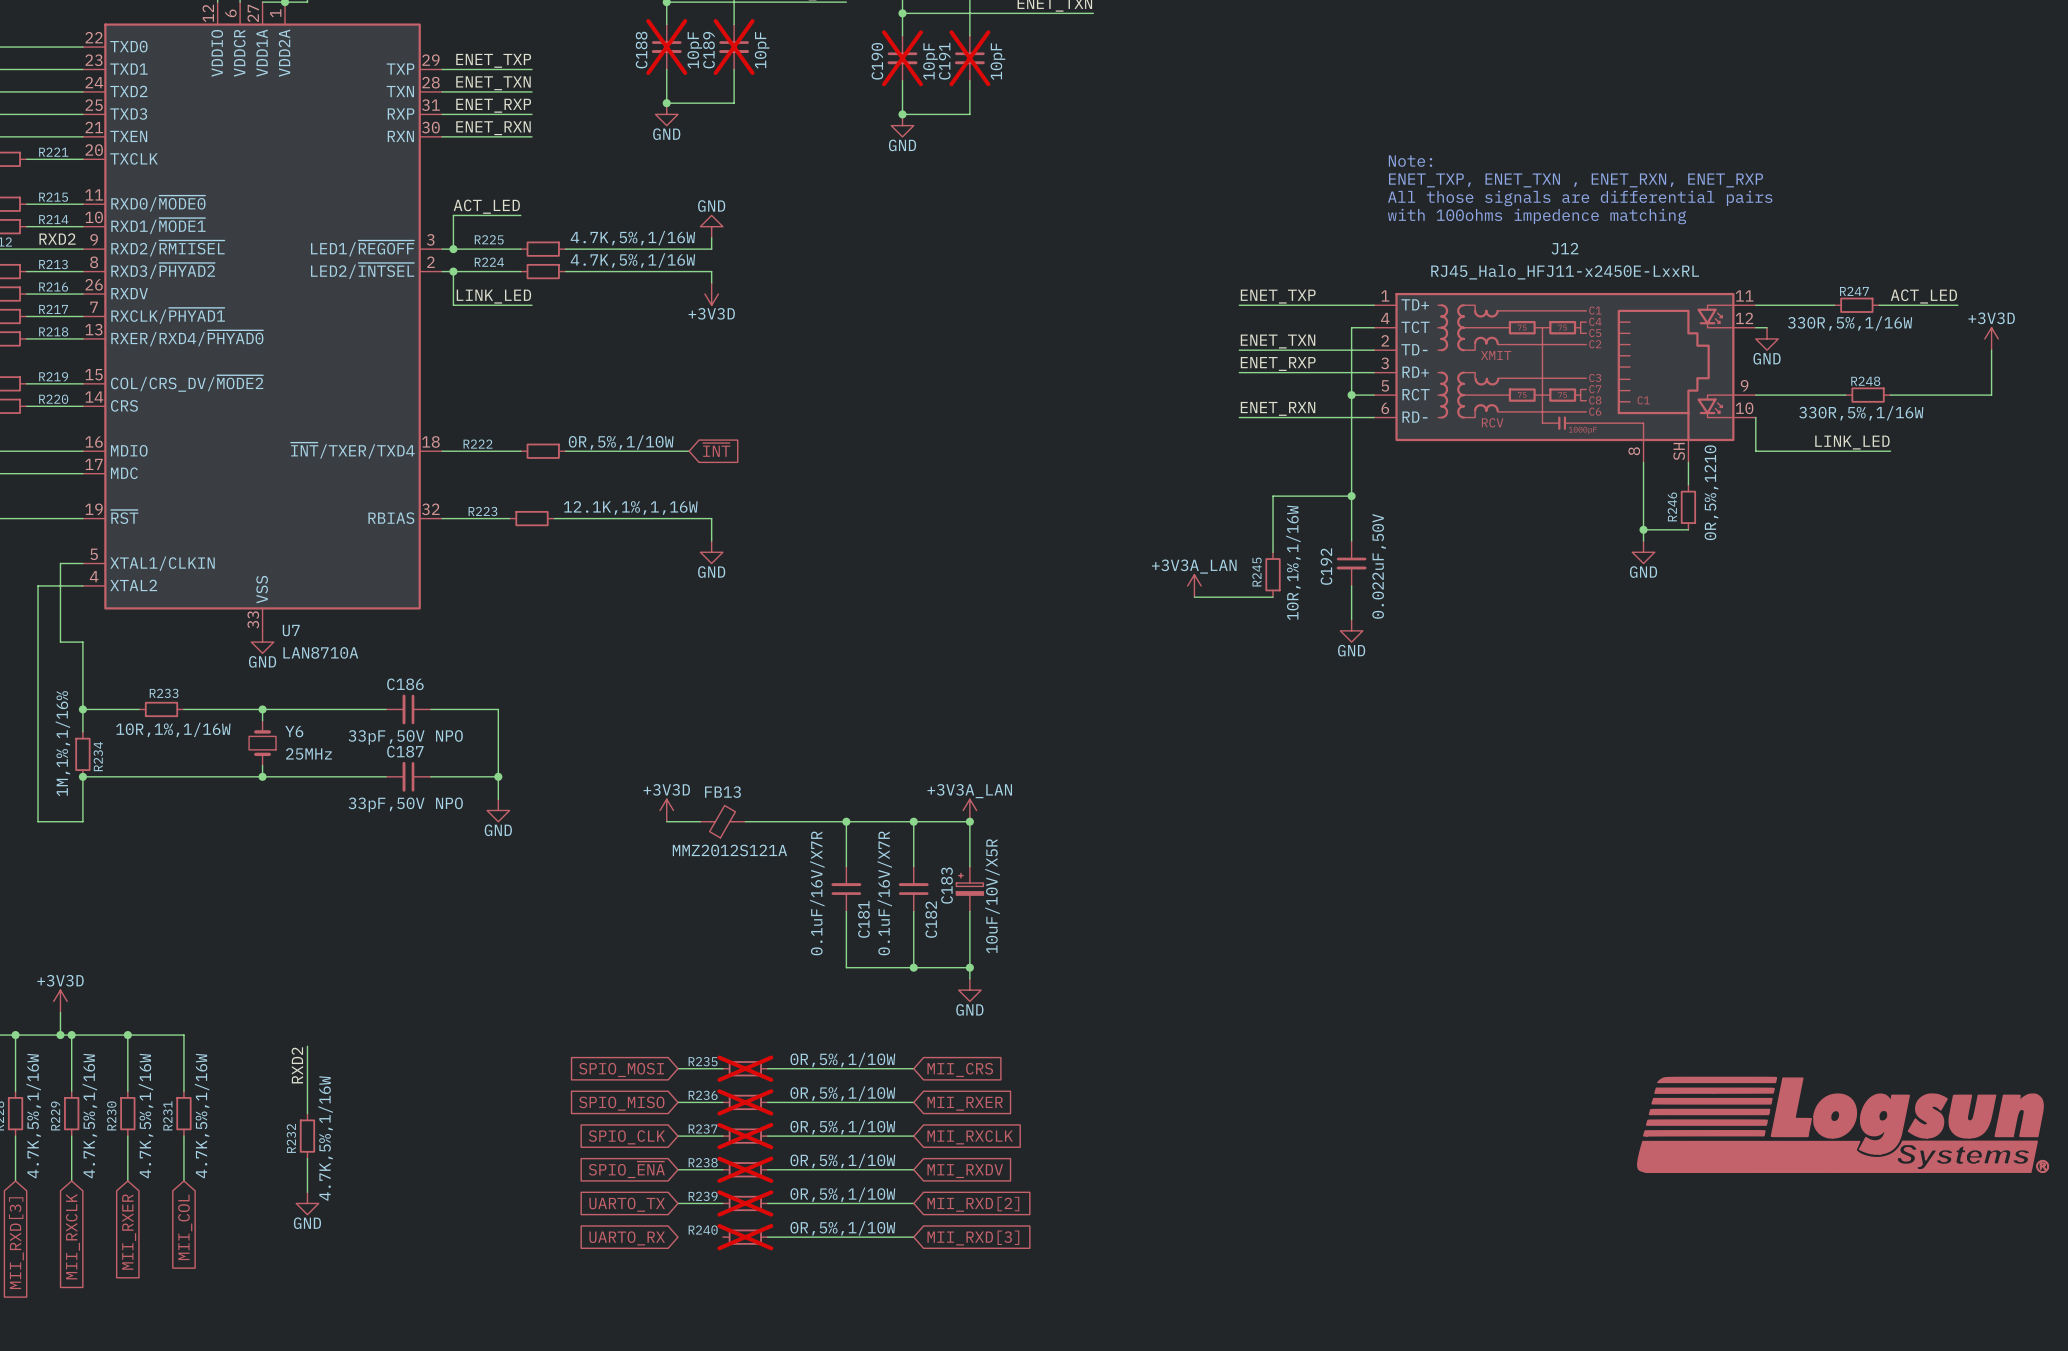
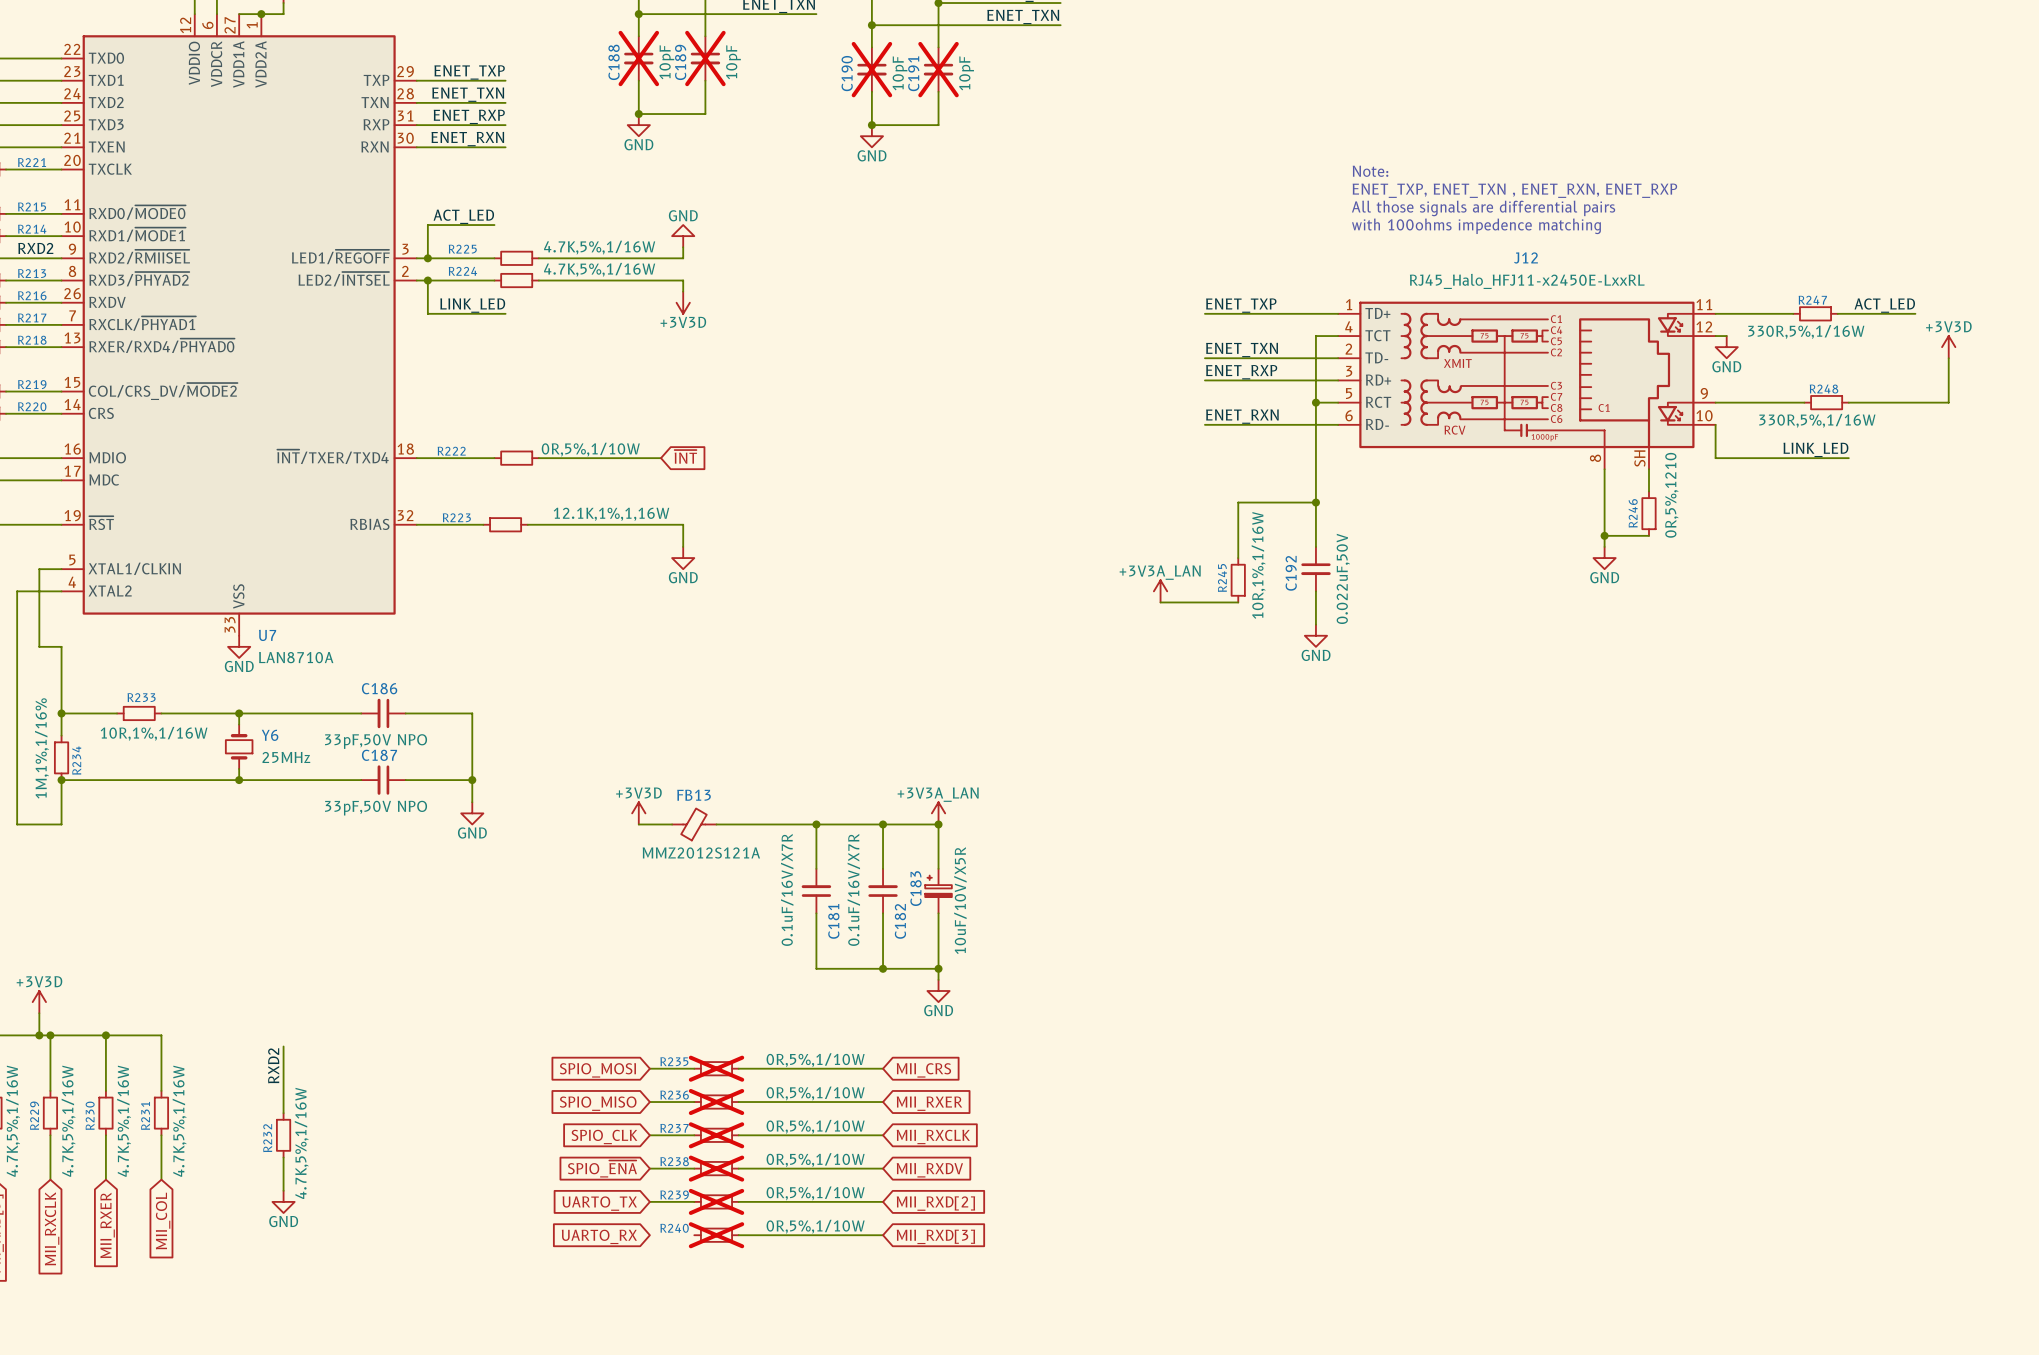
power symbol: (1843, 1124) -> none

